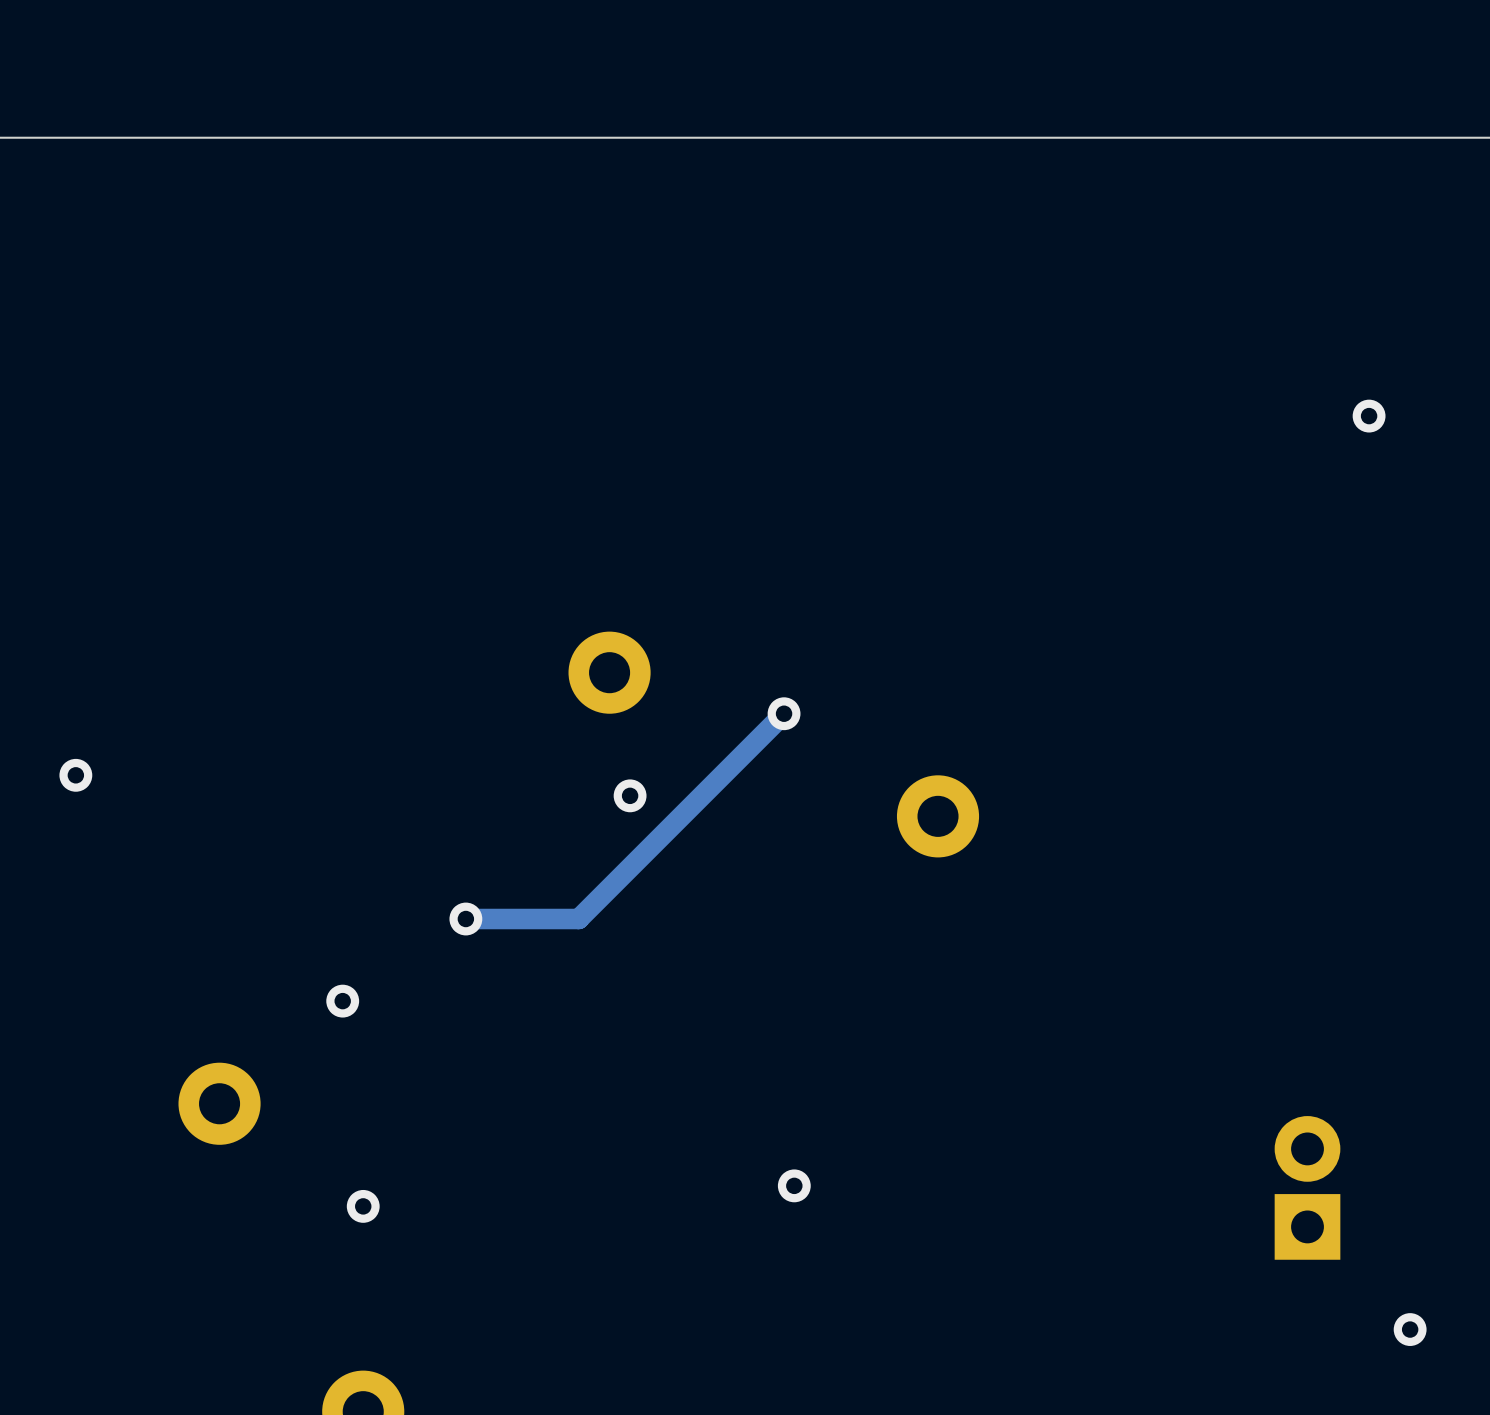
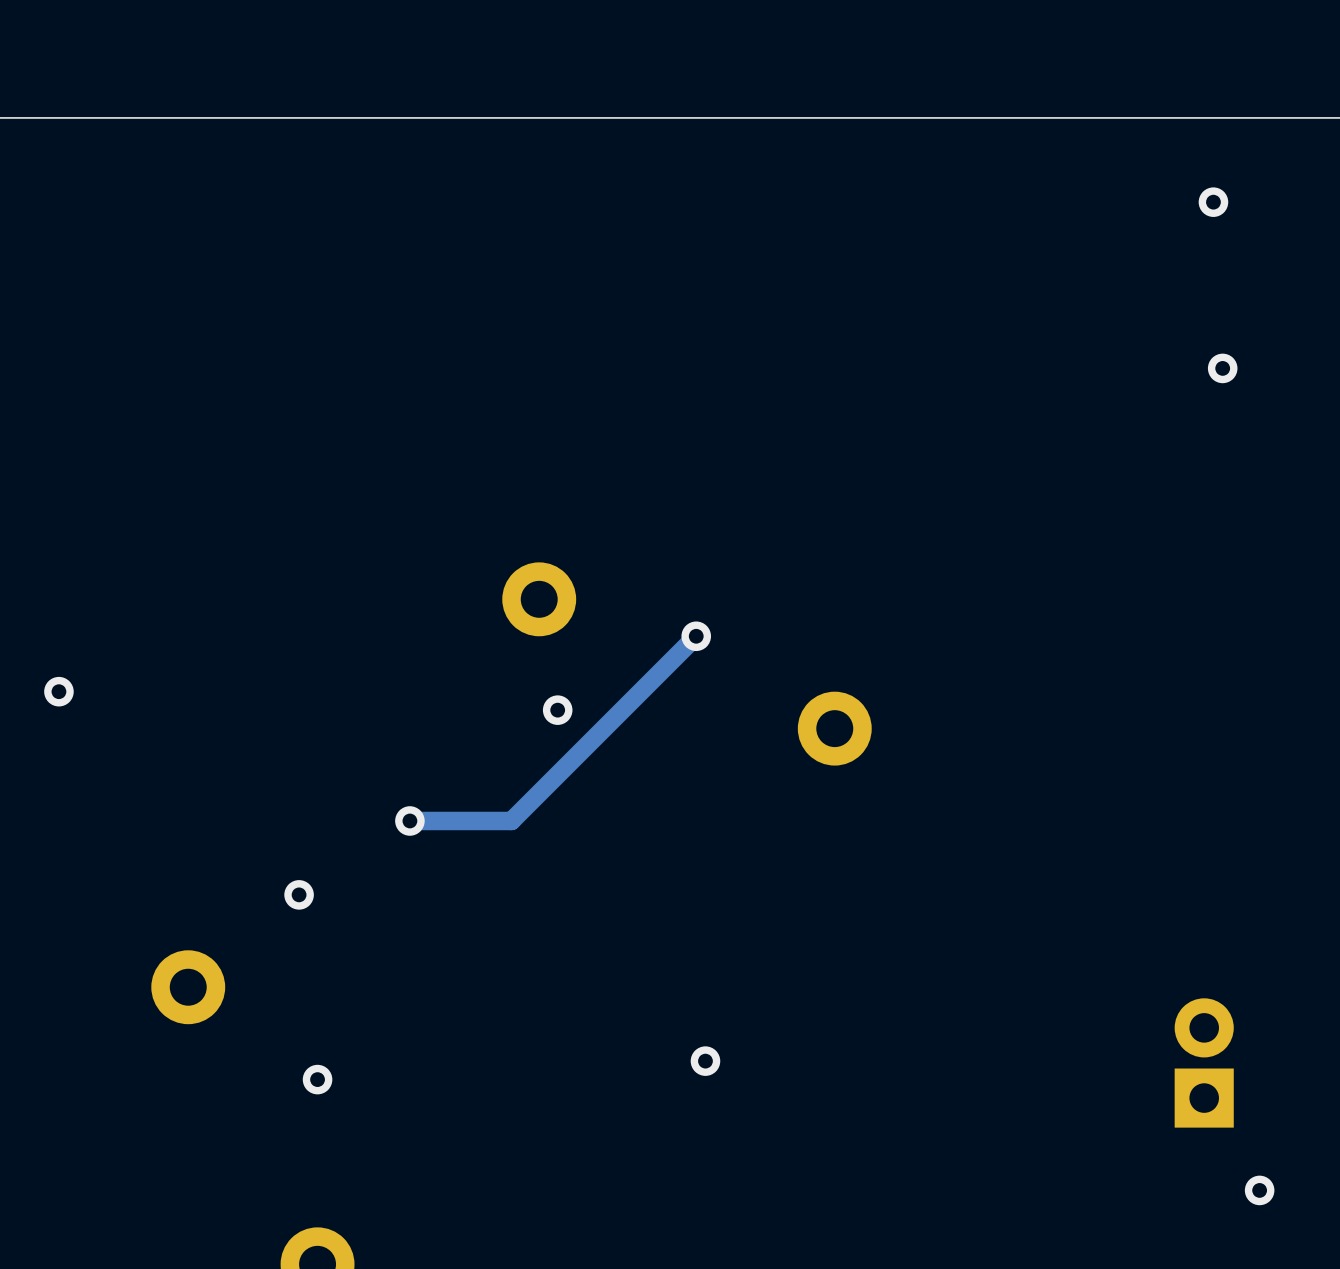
via: none -> (1213, 202)
part position: (1307, 1187) -> (1204, 1062)

